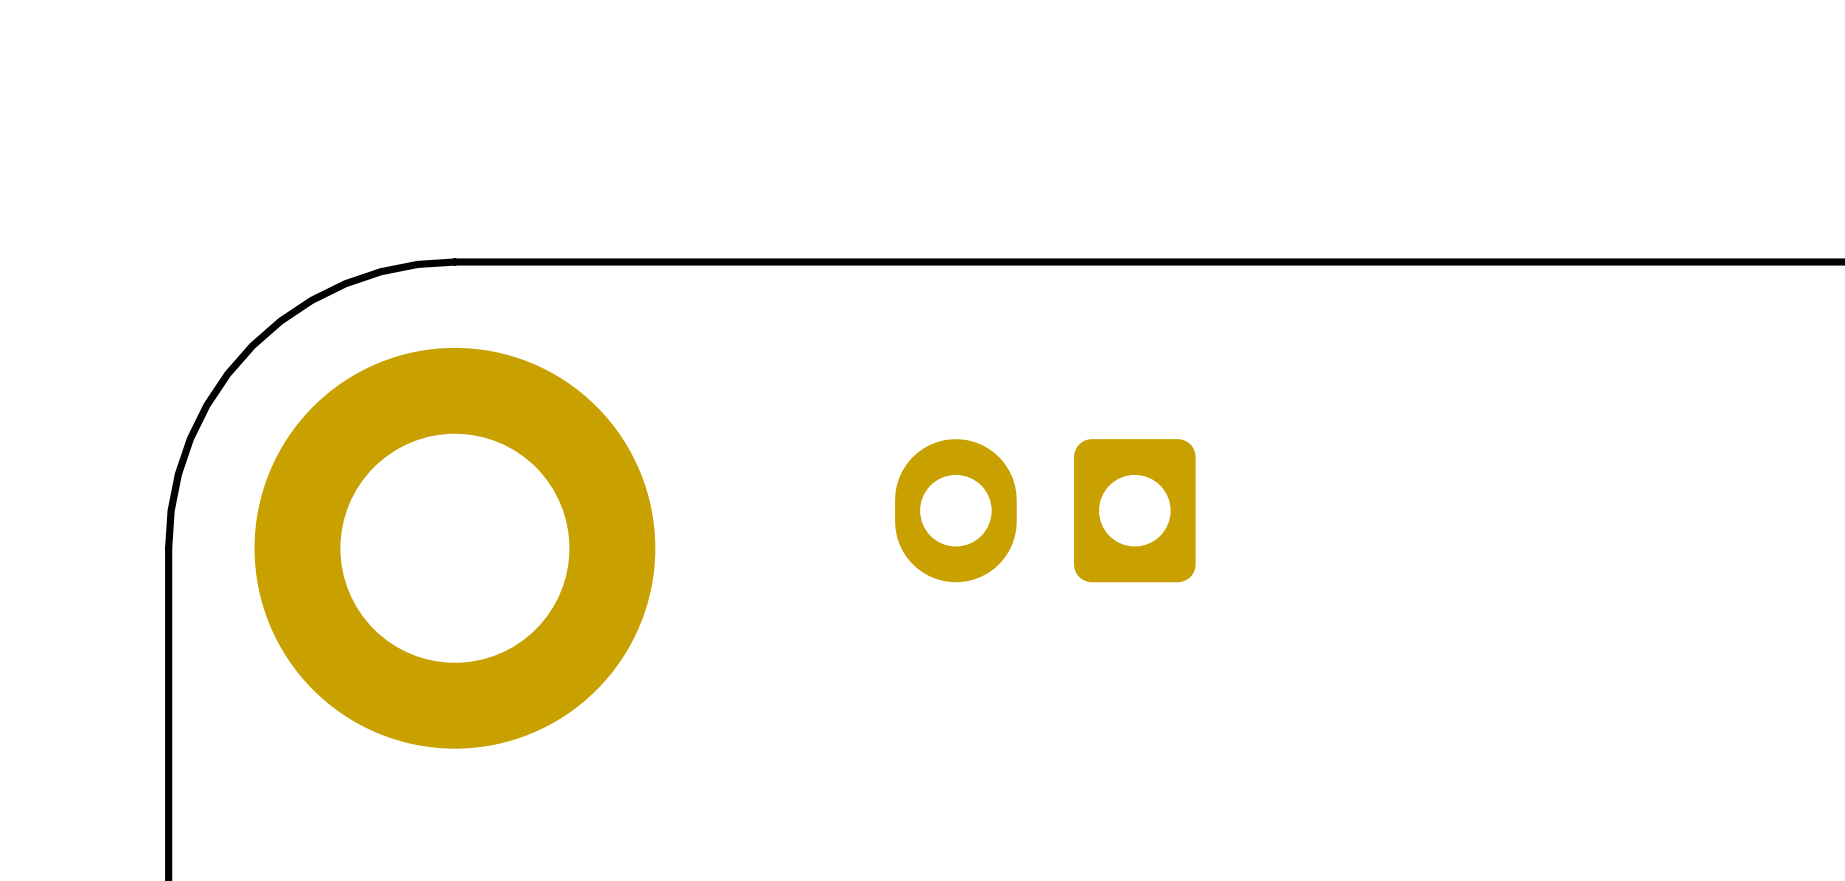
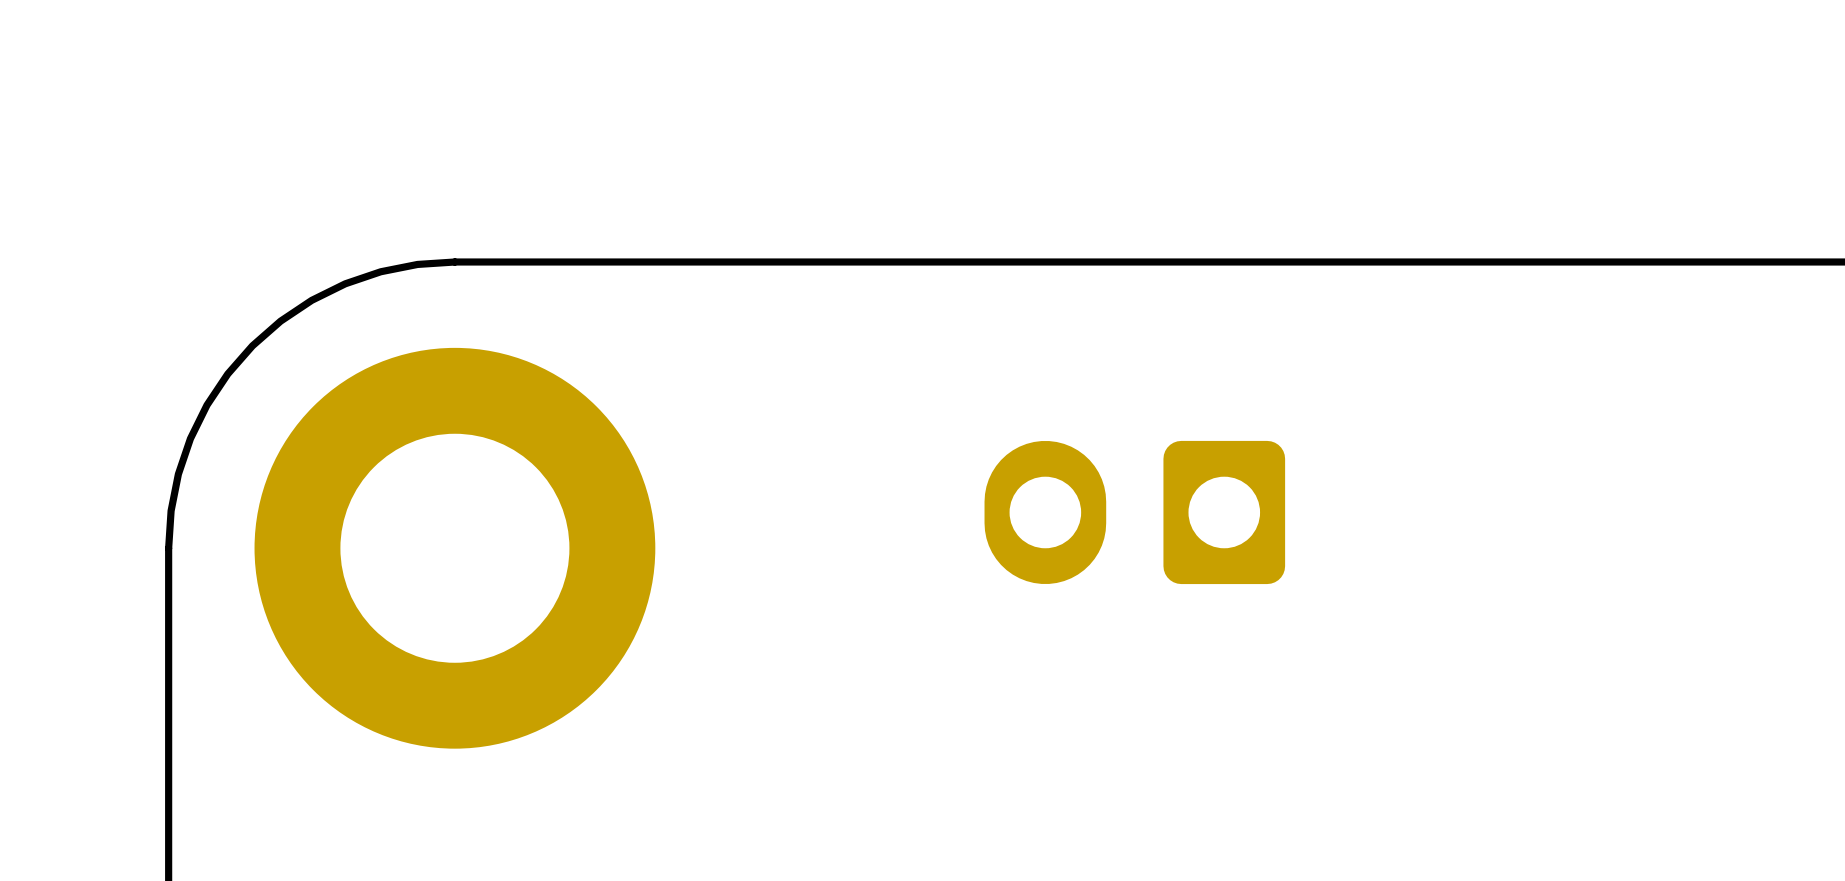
part position: (1045, 510) -> (1134, 512)

